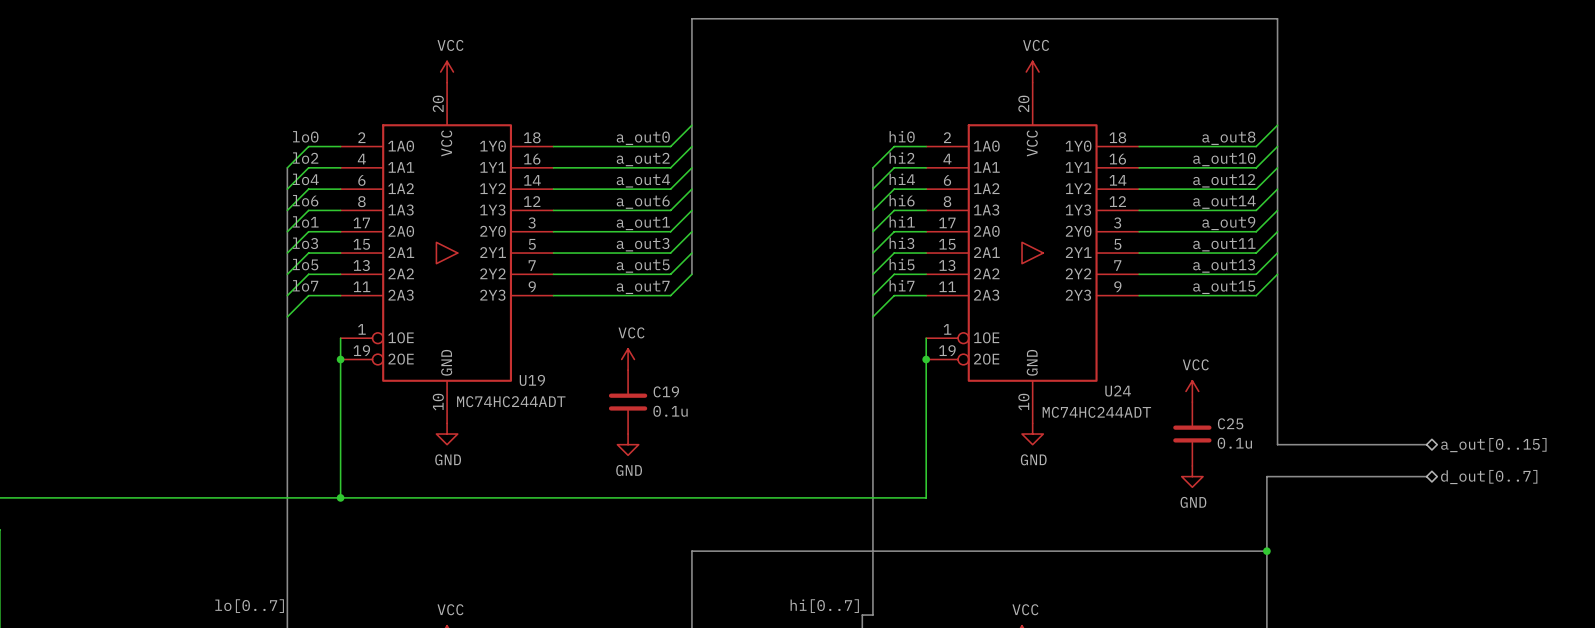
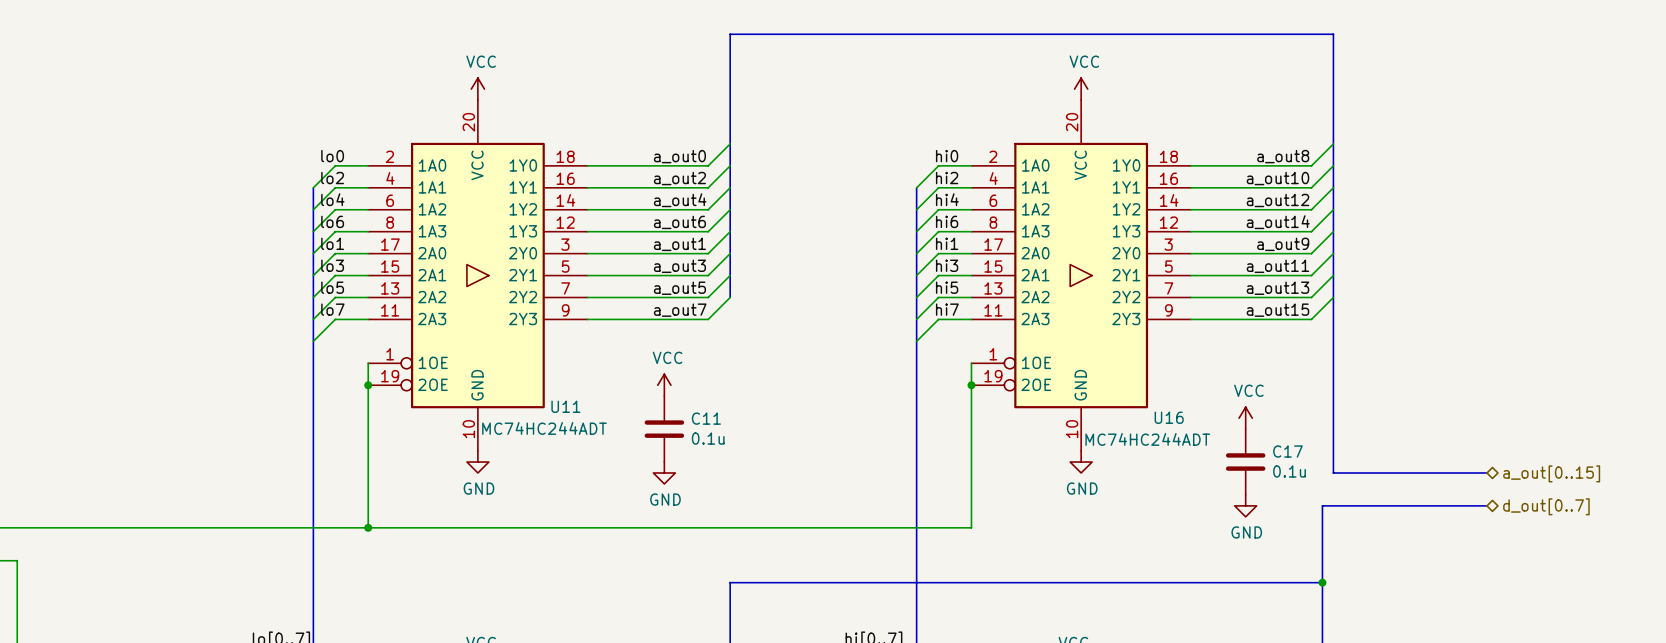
U19 name: U19 (532, 380) -> U11 (565, 406)
C19 name: C19 (666, 391) -> C11 (706, 418)
U24 name: U24 (1118, 391) -> U16 (1169, 417)
C25 name: C25 (1230, 423) -> C17 (1287, 451)

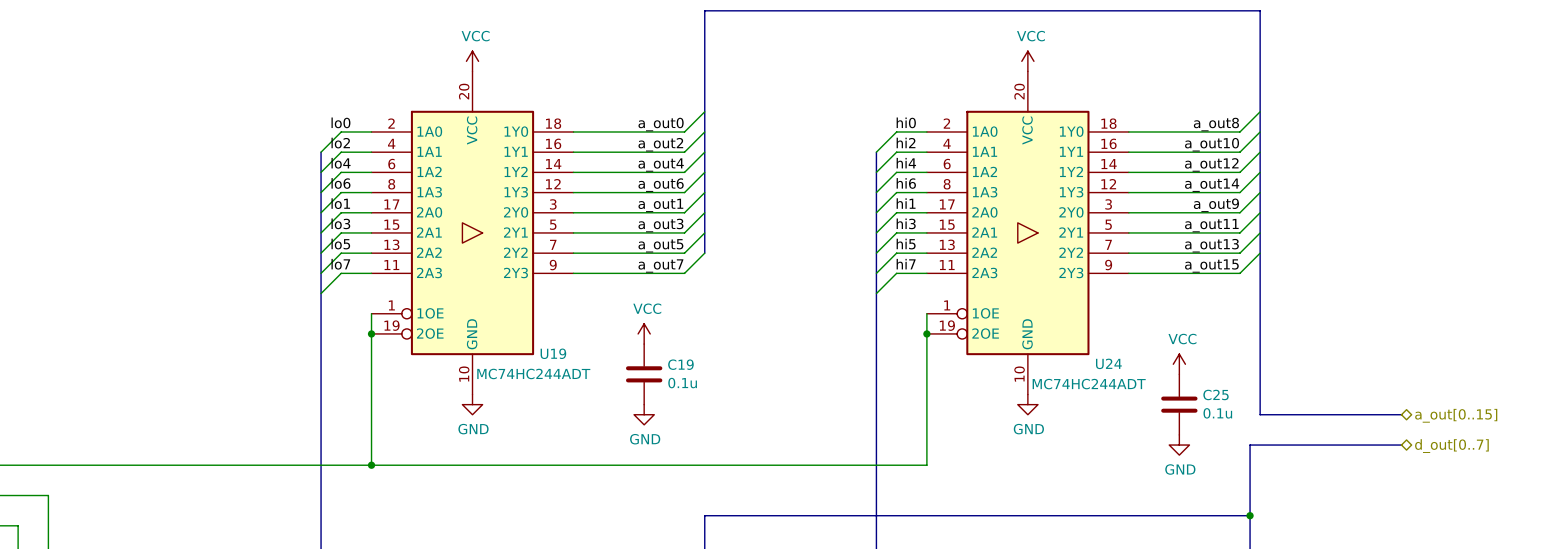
U11 name: U11 (565, 406) -> U19 (553, 353)
U16 name: U16 (1169, 417) -> U24 (1108, 363)
C11 name: C11 (706, 418) -> C19 (680, 364)
C17 name: C17 (1287, 451) -> C25 (1216, 394)

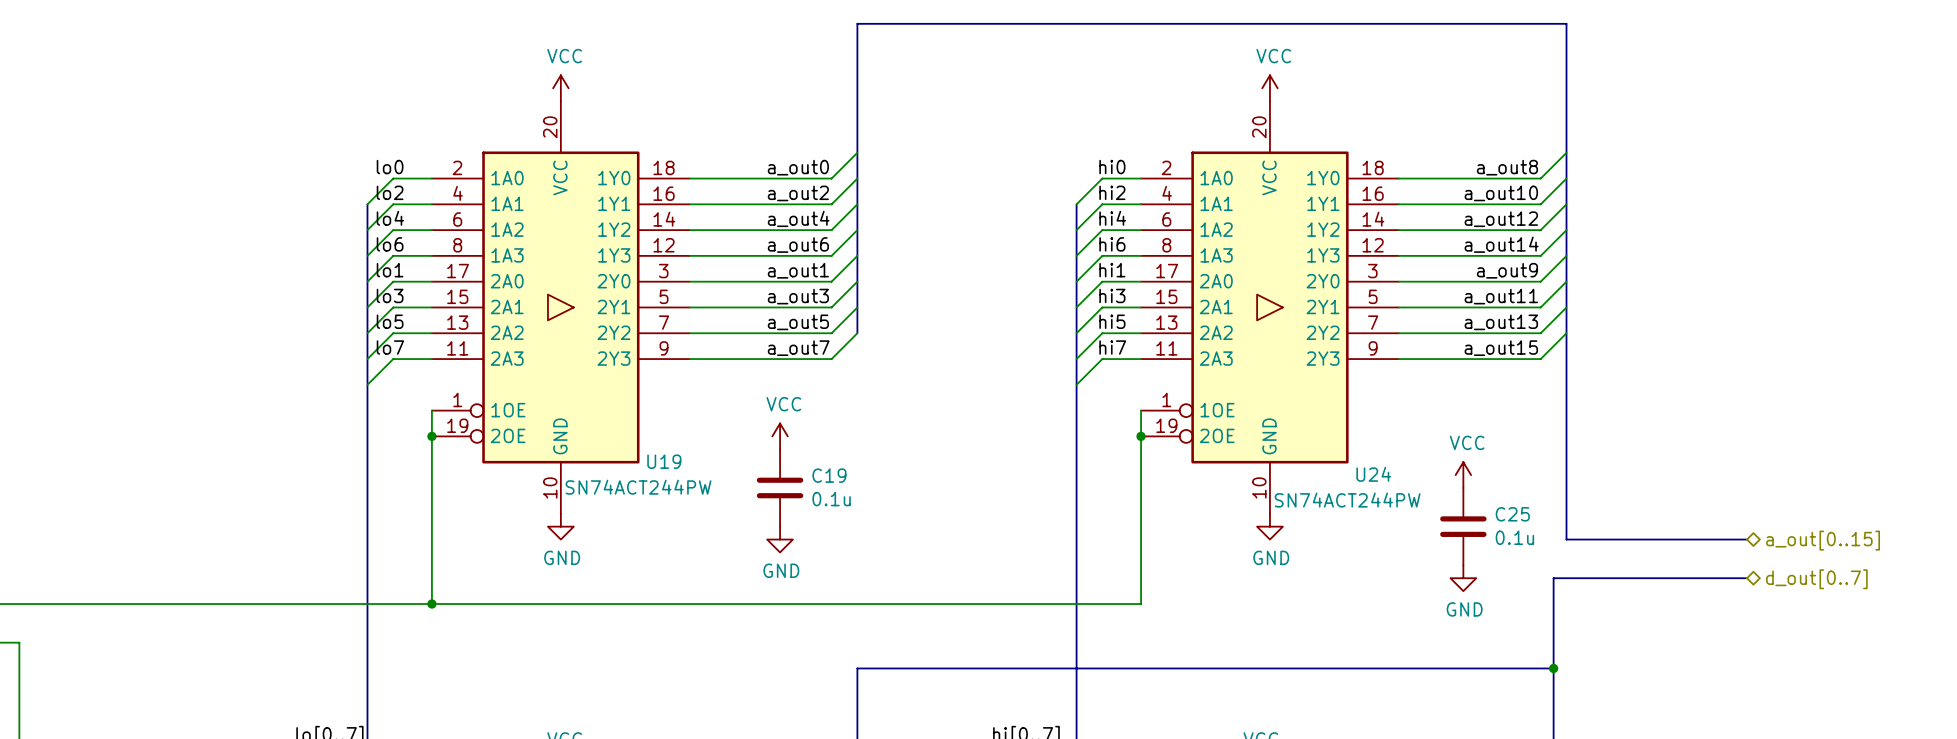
U19 value: MC74HC244ADT (533, 373) -> SN74ACT244PW (638, 487)
U24 value: MC74HC244ADT (1089, 384) -> SN74ACT244PW (1347, 500)

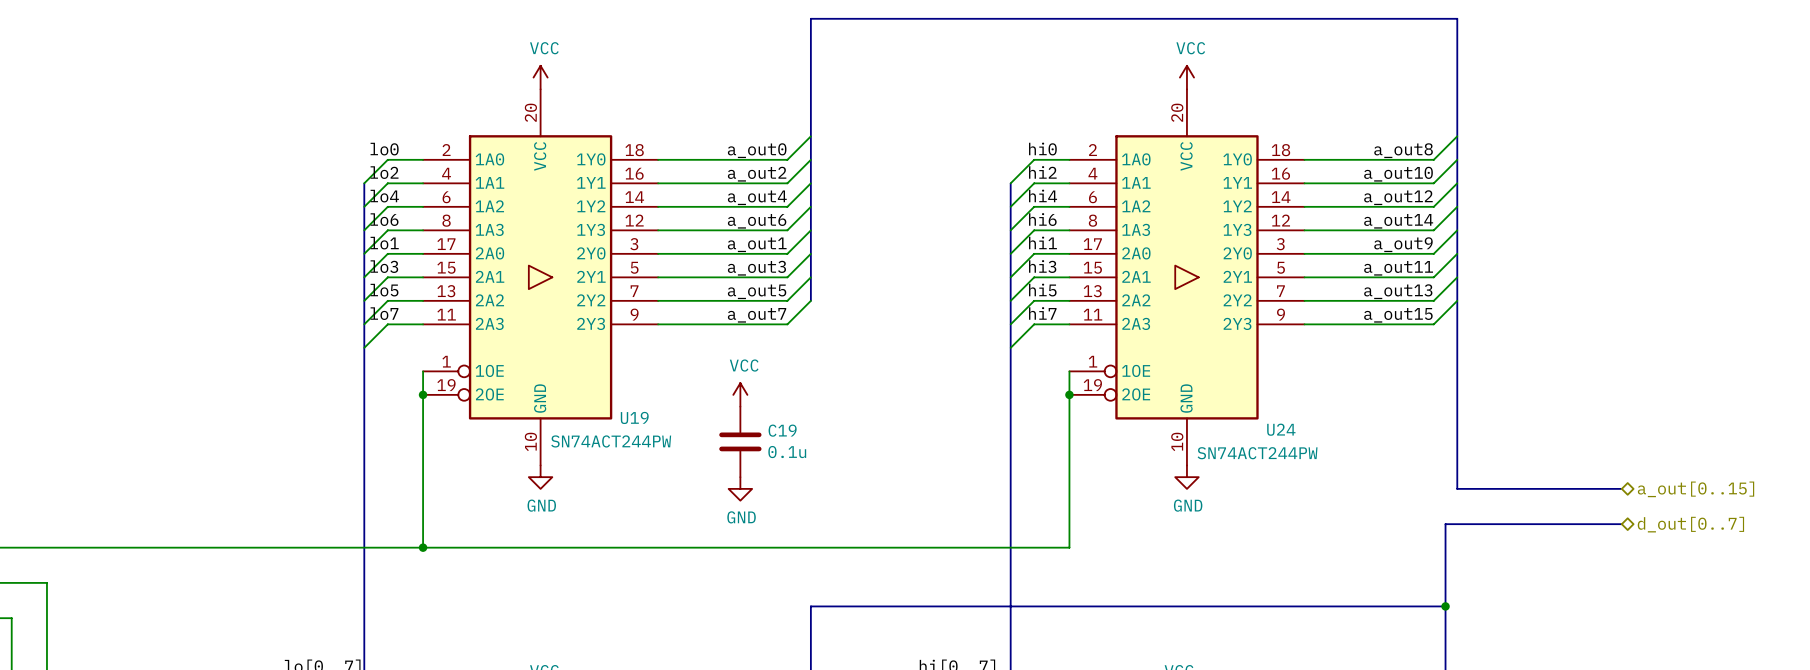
power symbol: VCC (1463, 475) -> none
C25: 0.1u (1463, 526) -> none
power symbol: GND (1463, 578) -> none

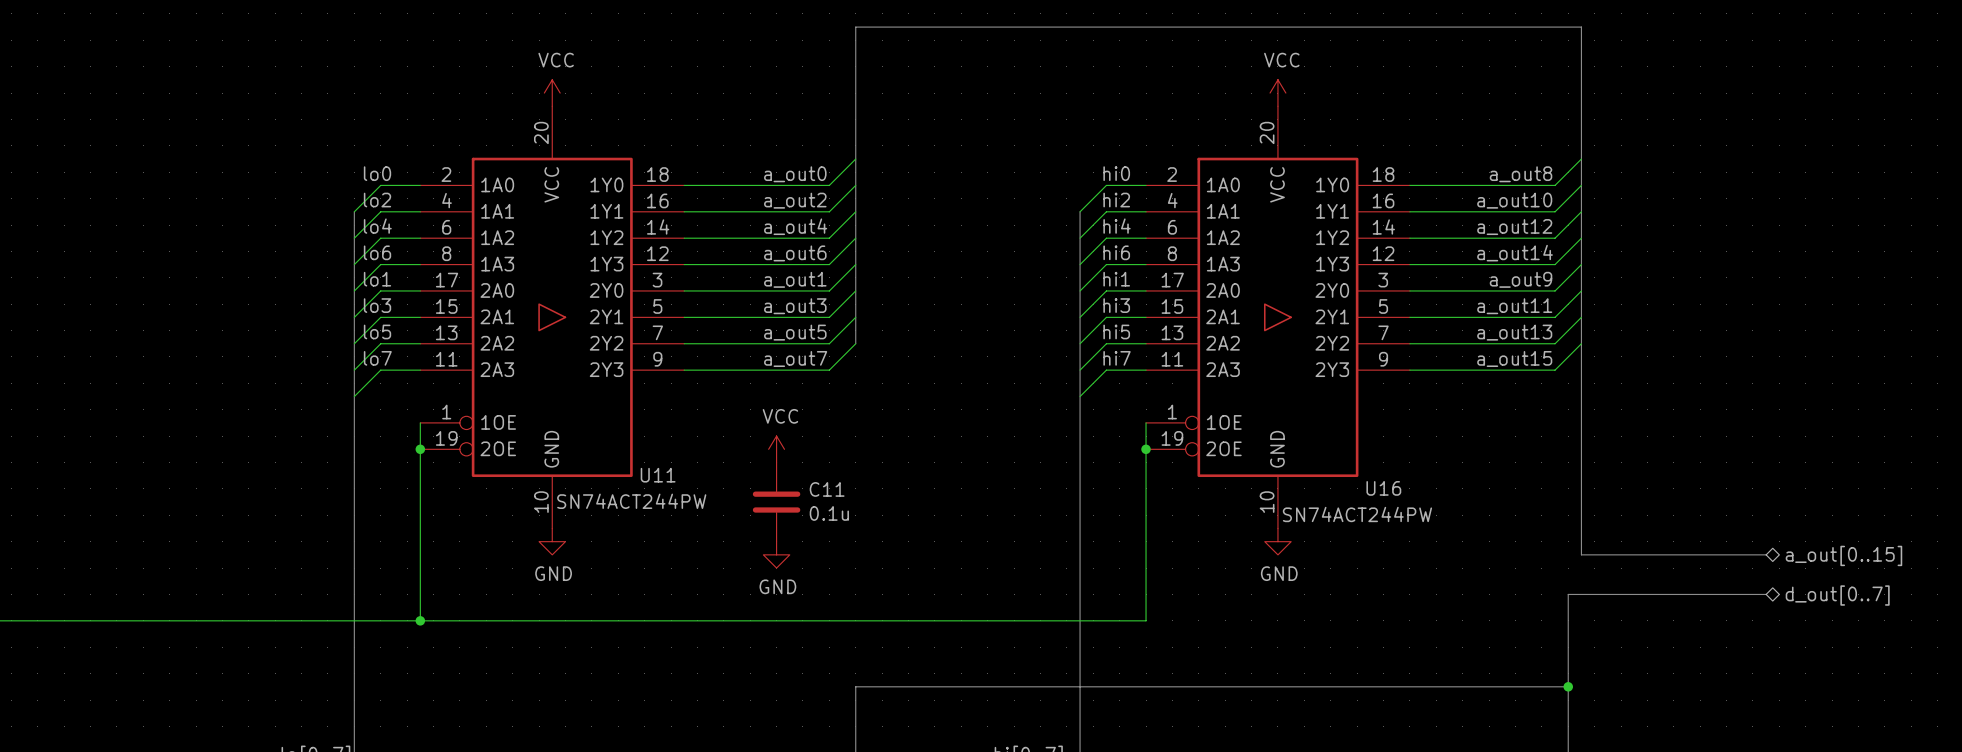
U19 name: U19 (634, 417) -> U11 (658, 475)
U24 name: U24 (1281, 429) -> U16 (1383, 488)
C19 name: C19 (782, 430) -> C11 (827, 489)

